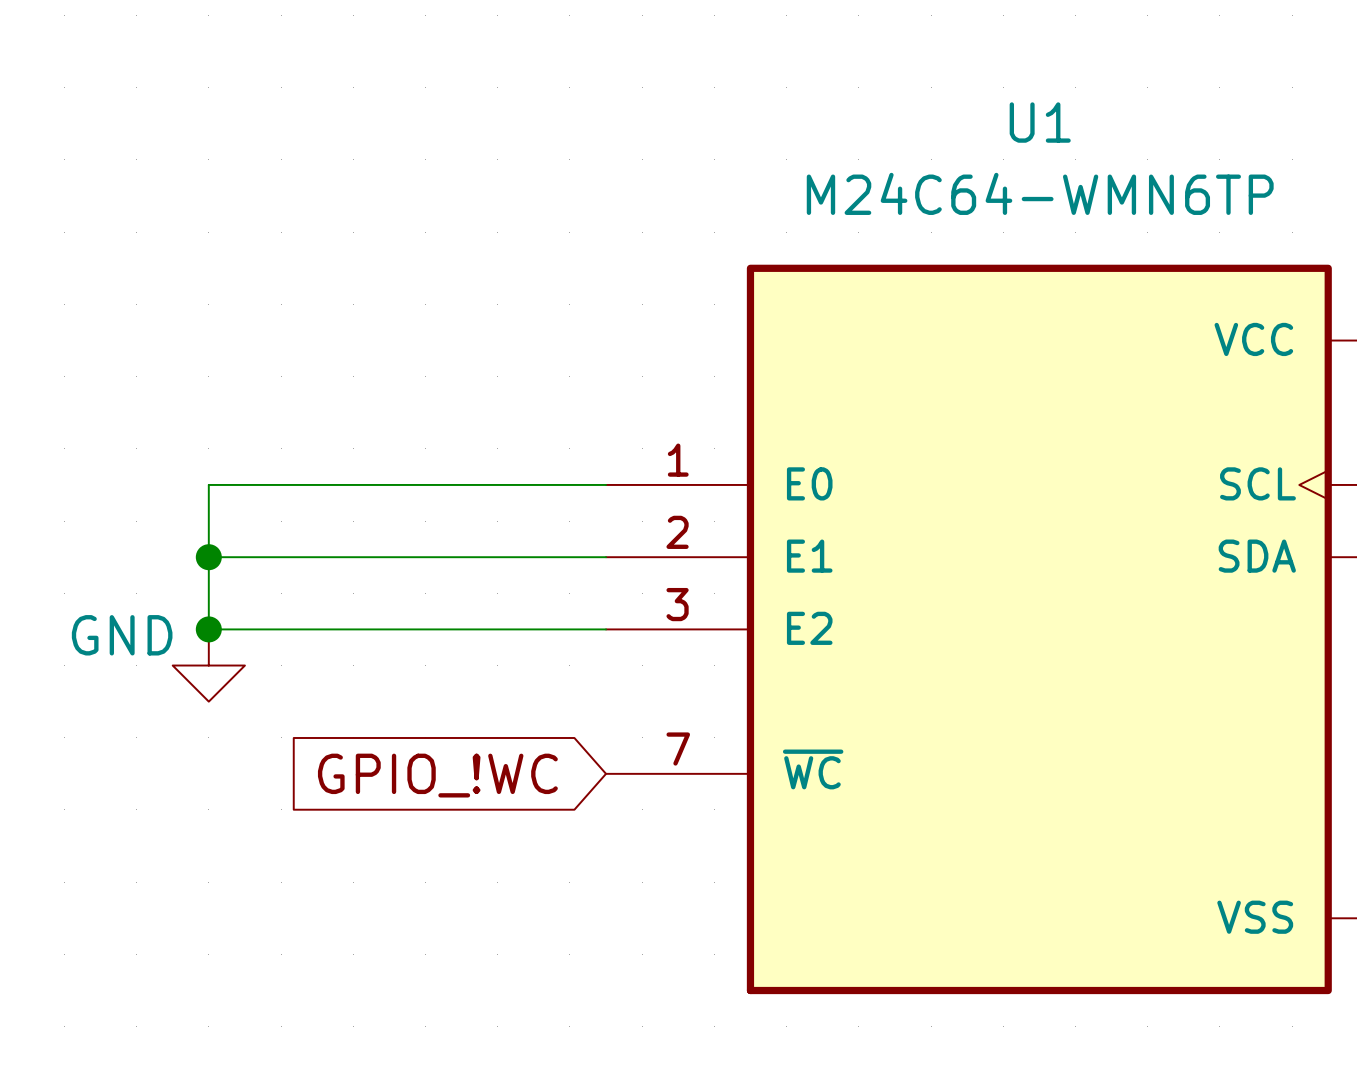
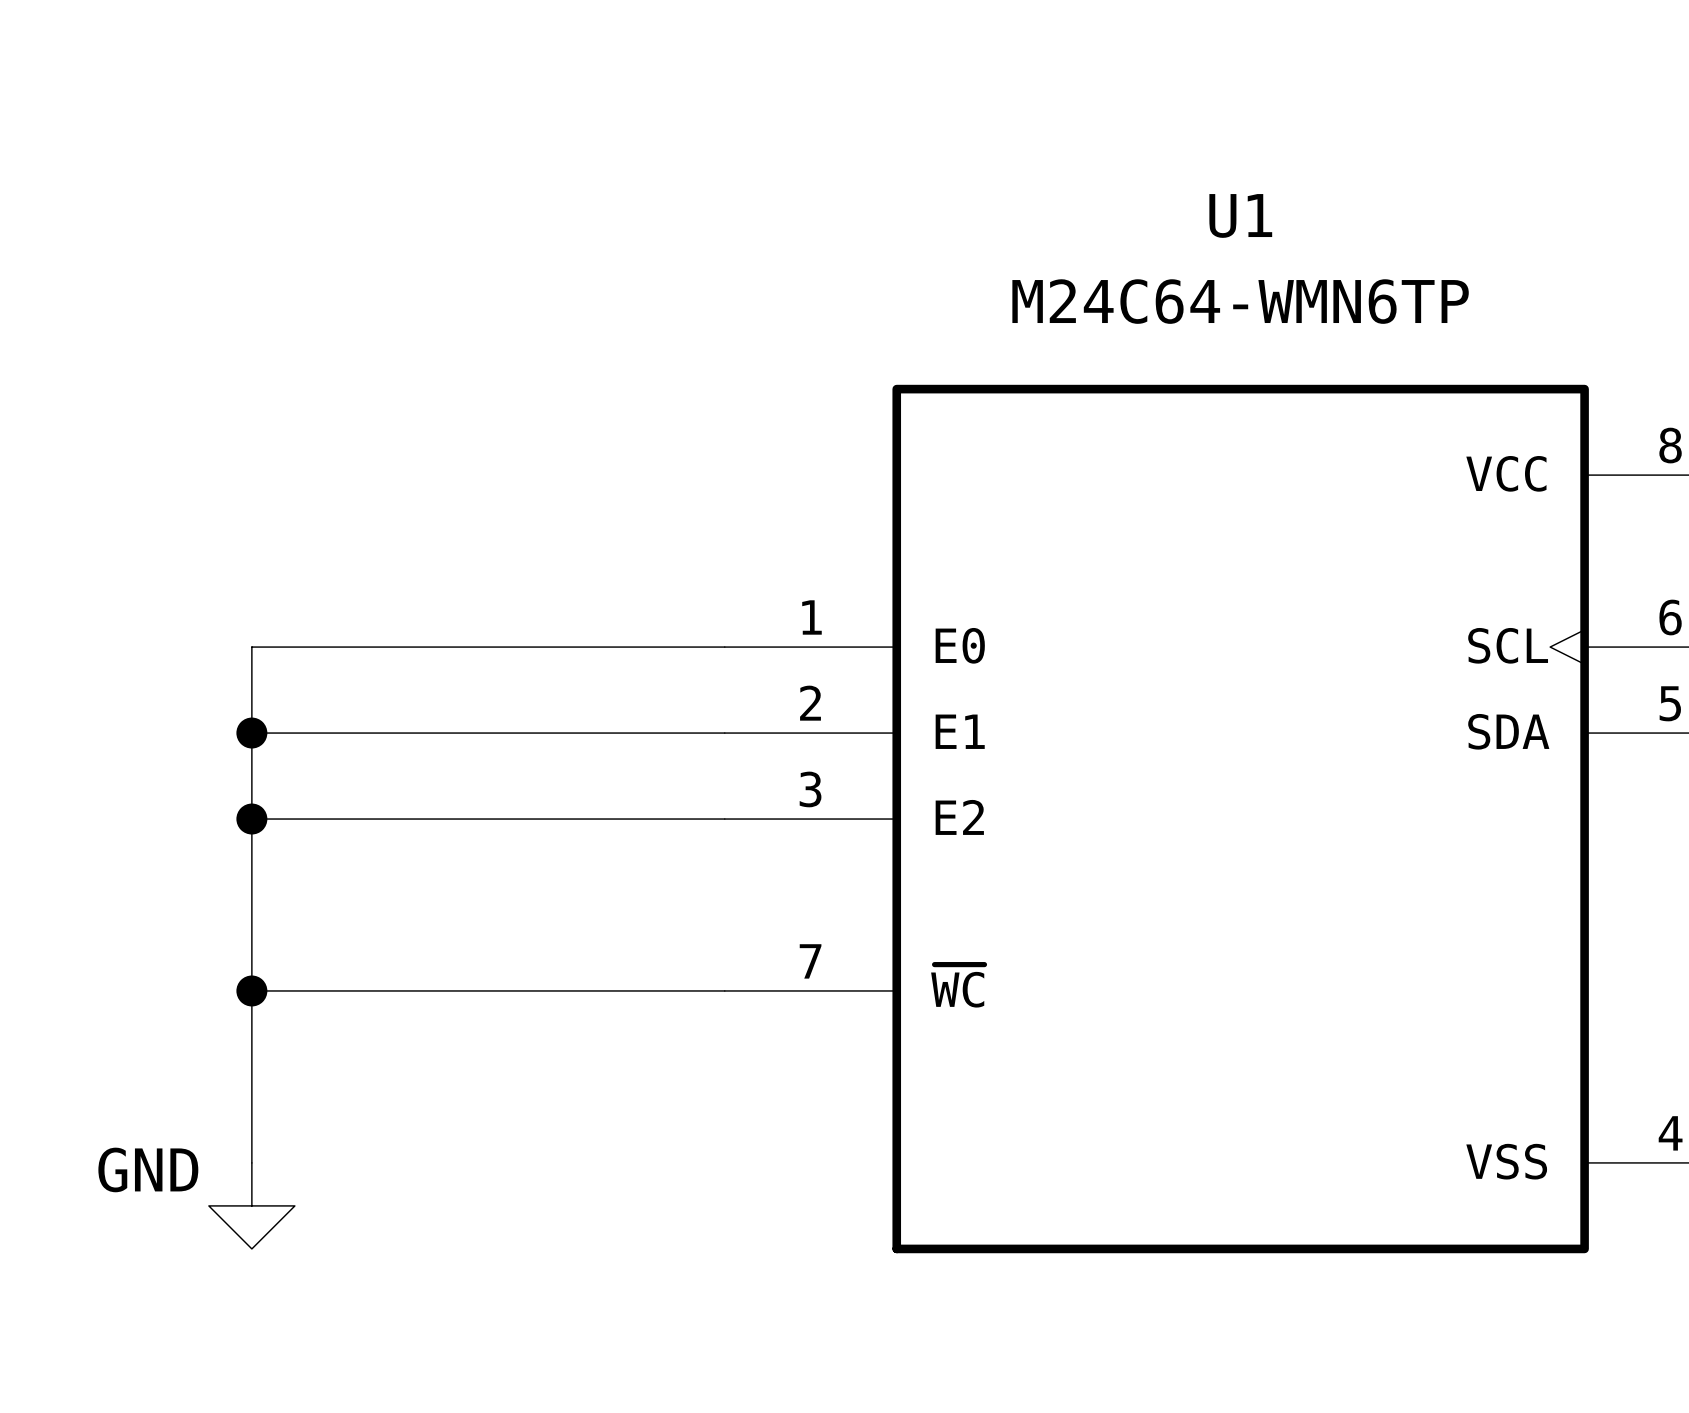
wire: none -> (251, 819) (251, 1162)
power symbol position: GND (208, 665) -> GND (251, 1205)
wire: none -> (251, 990) (724, 990)
junction: none -> (251, 990)
global label: GPIO_!WC (437, 775) -> none

